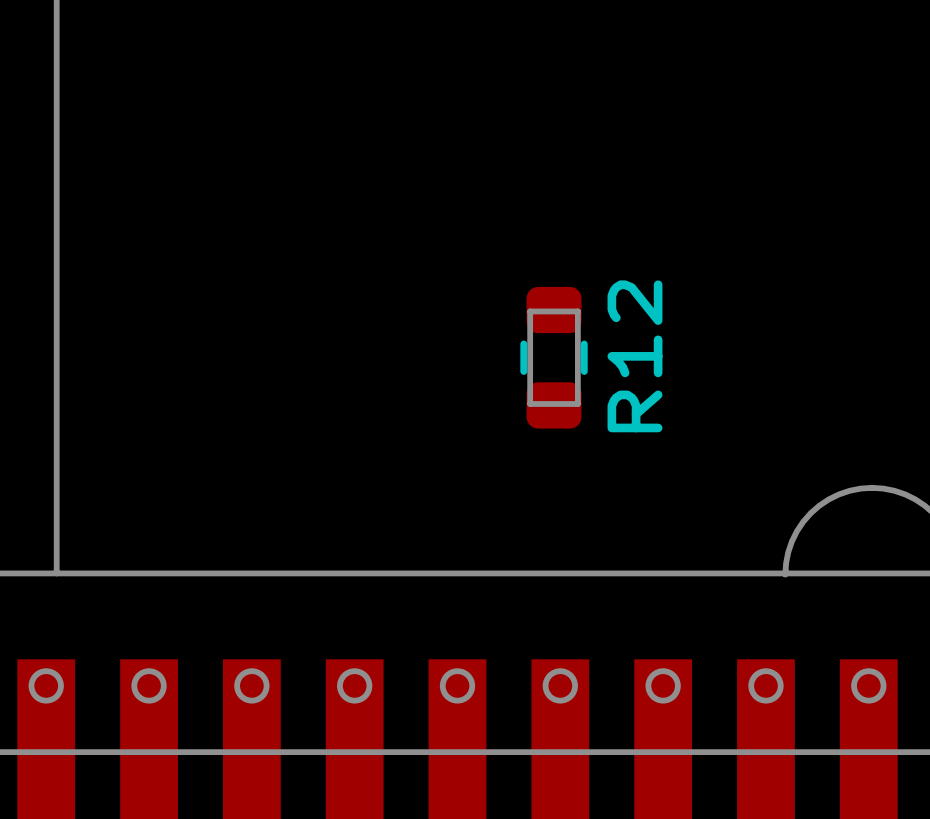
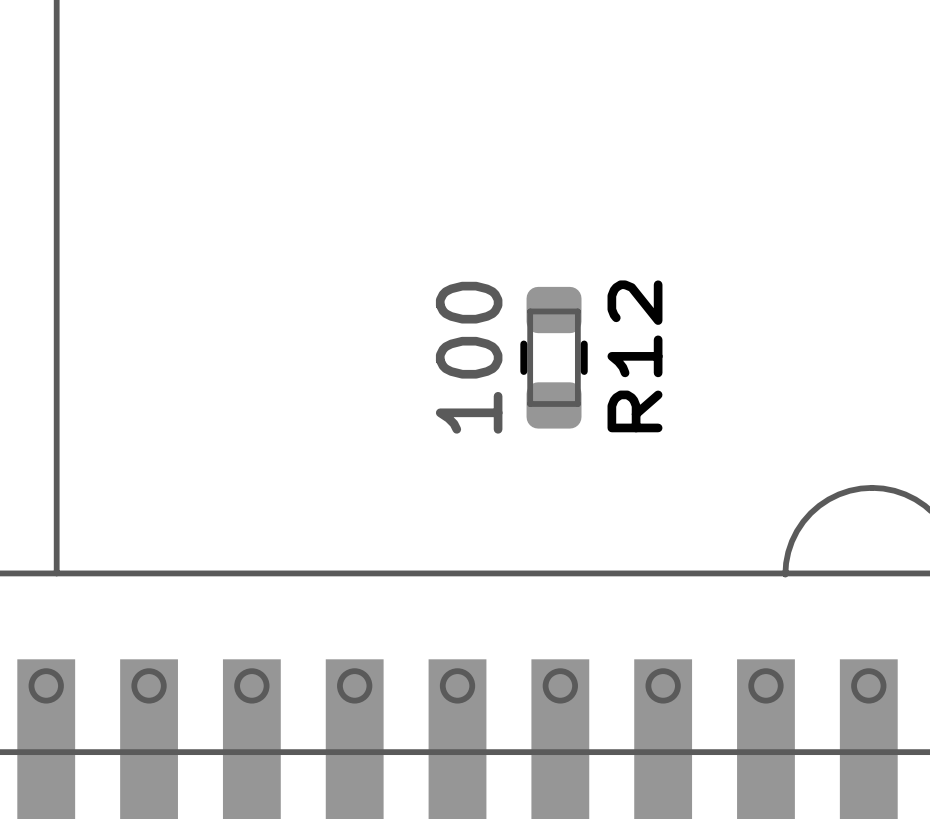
R12 value: none -> 100 (469, 357)

